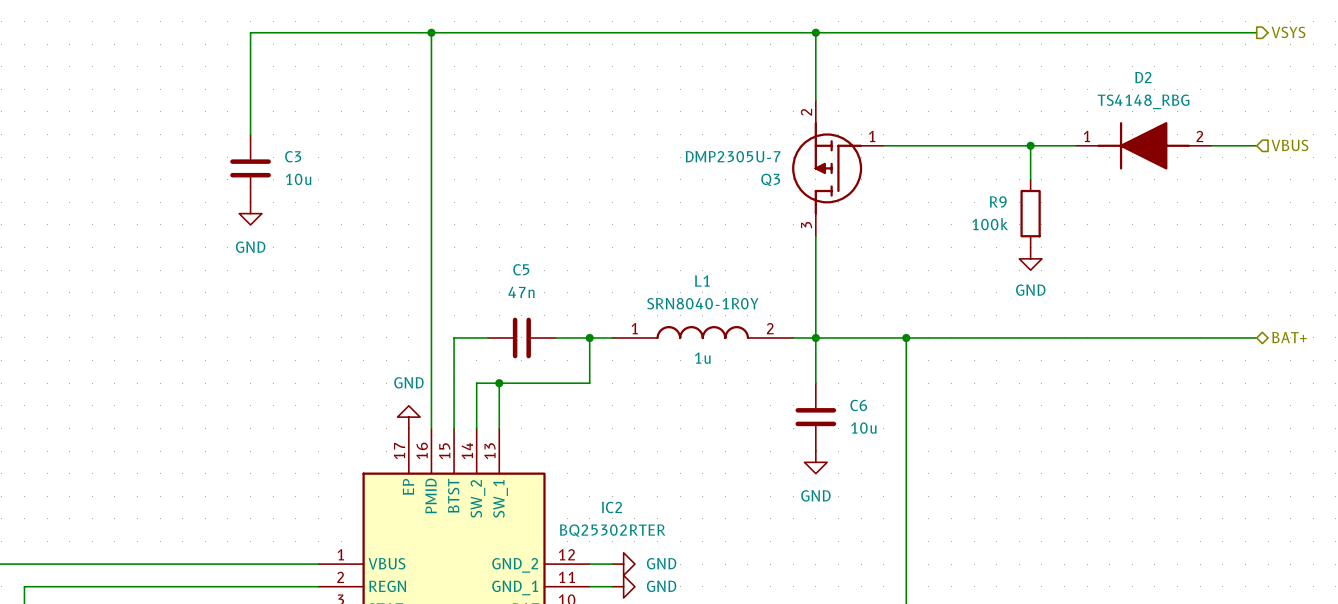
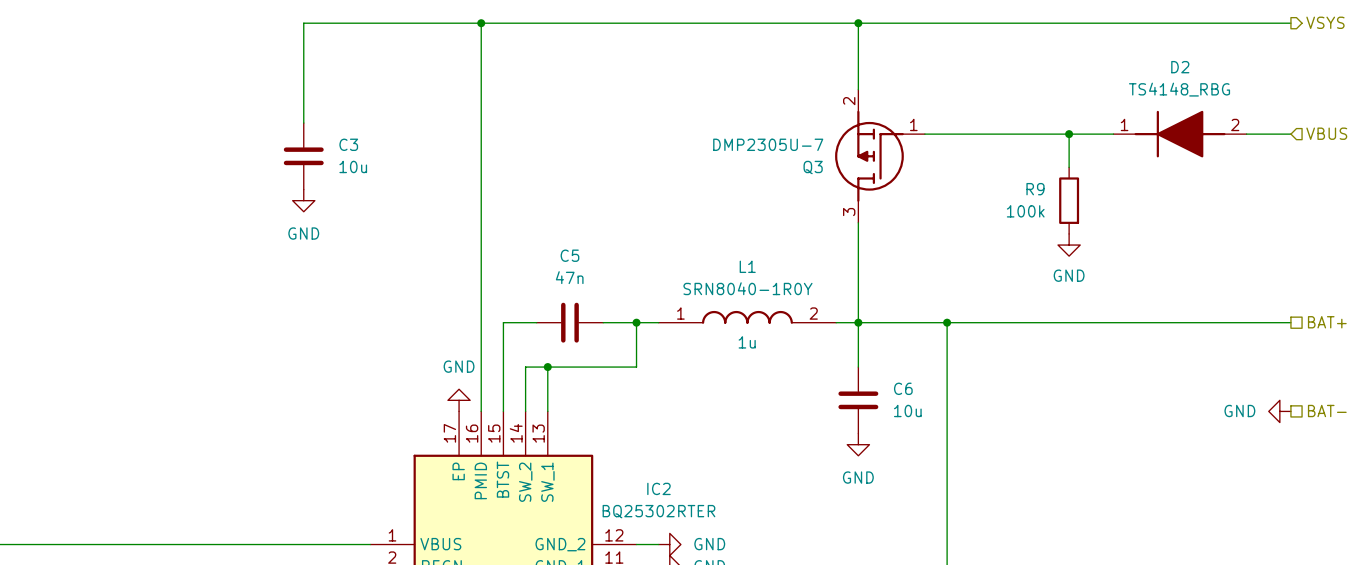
hierarchical label shape: bidirectional (1289, 337) -> passive (1327, 322)
power symbol: none -> GND (1279, 411)
hierarchical label: none -> BAT- (1327, 411)

